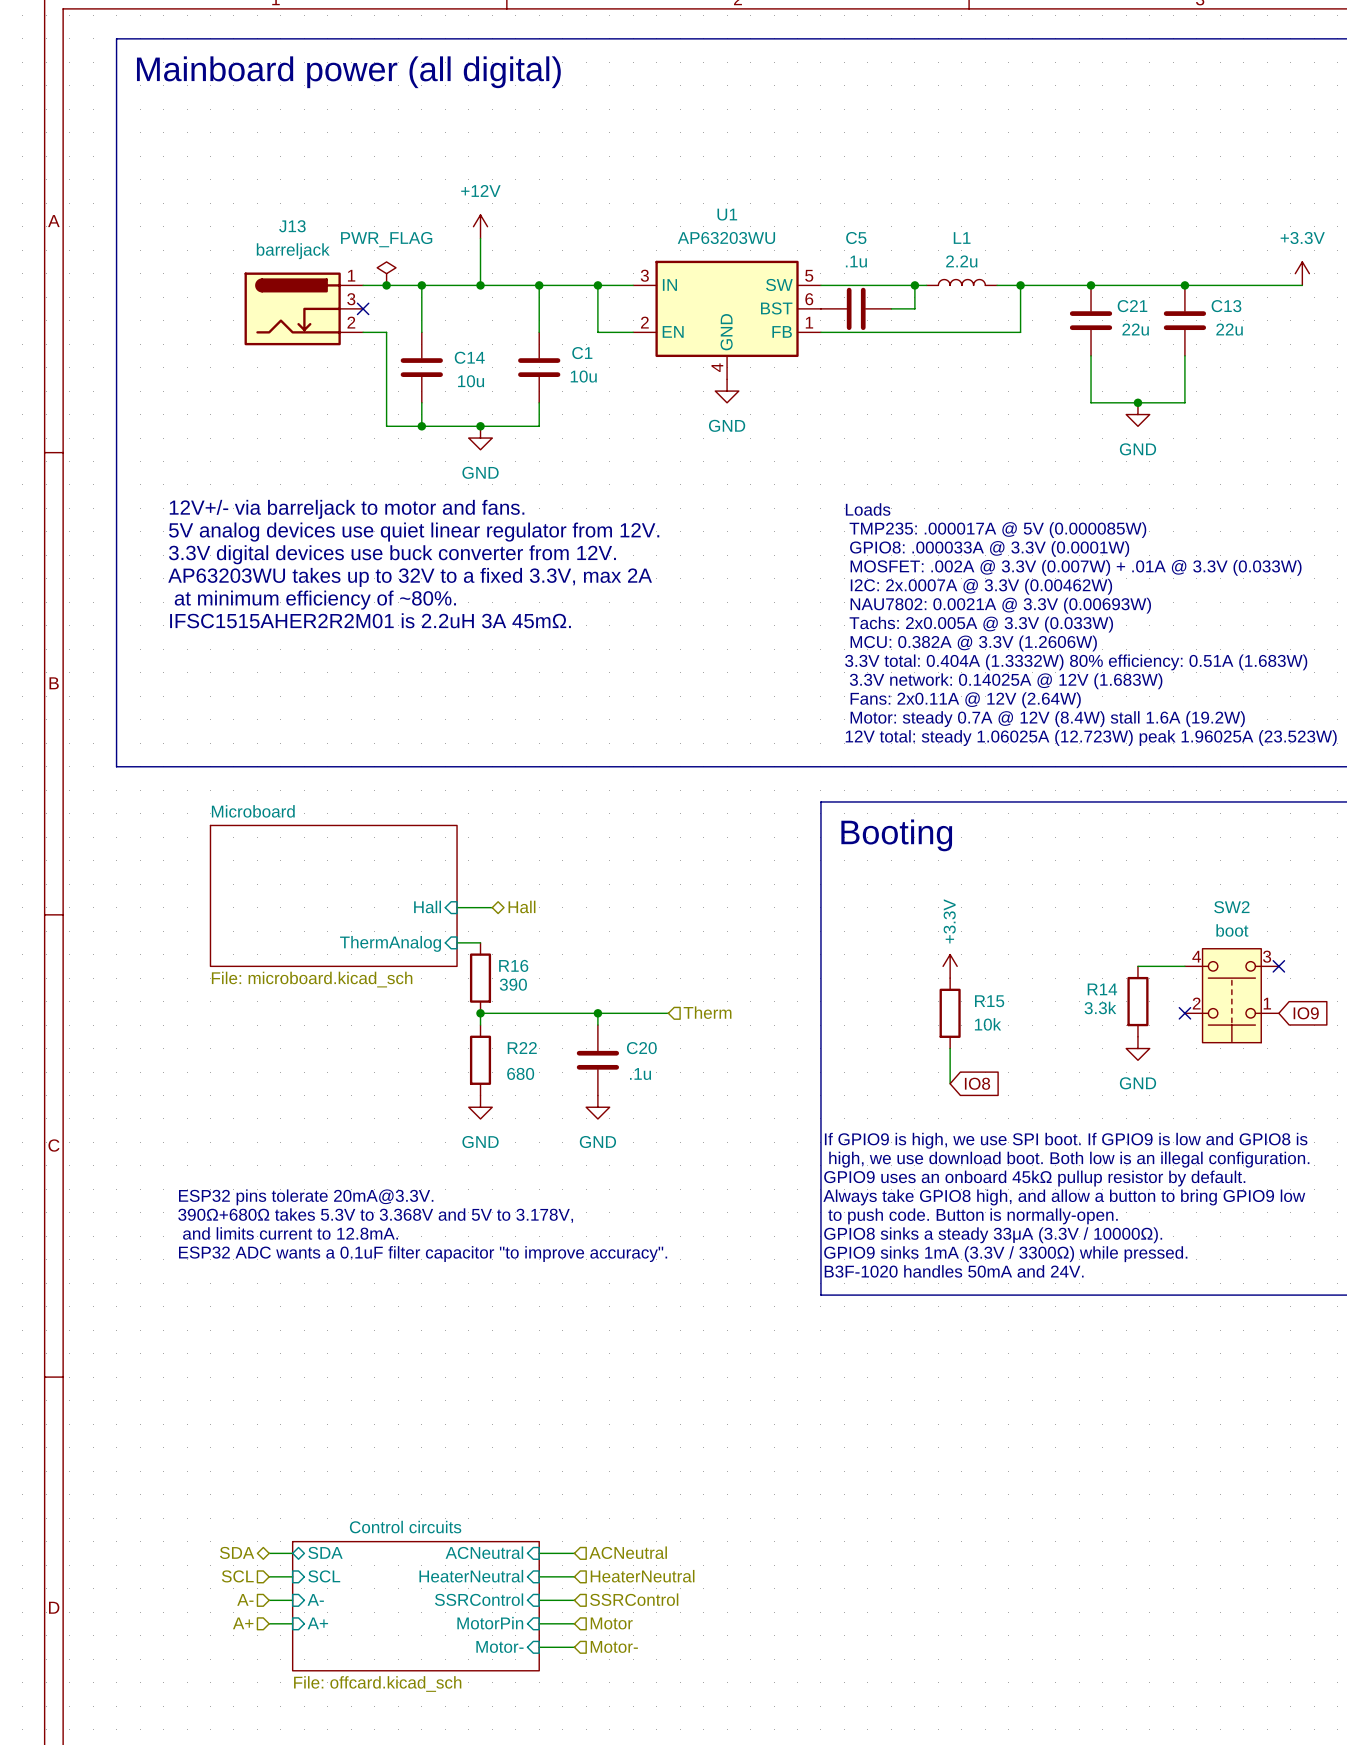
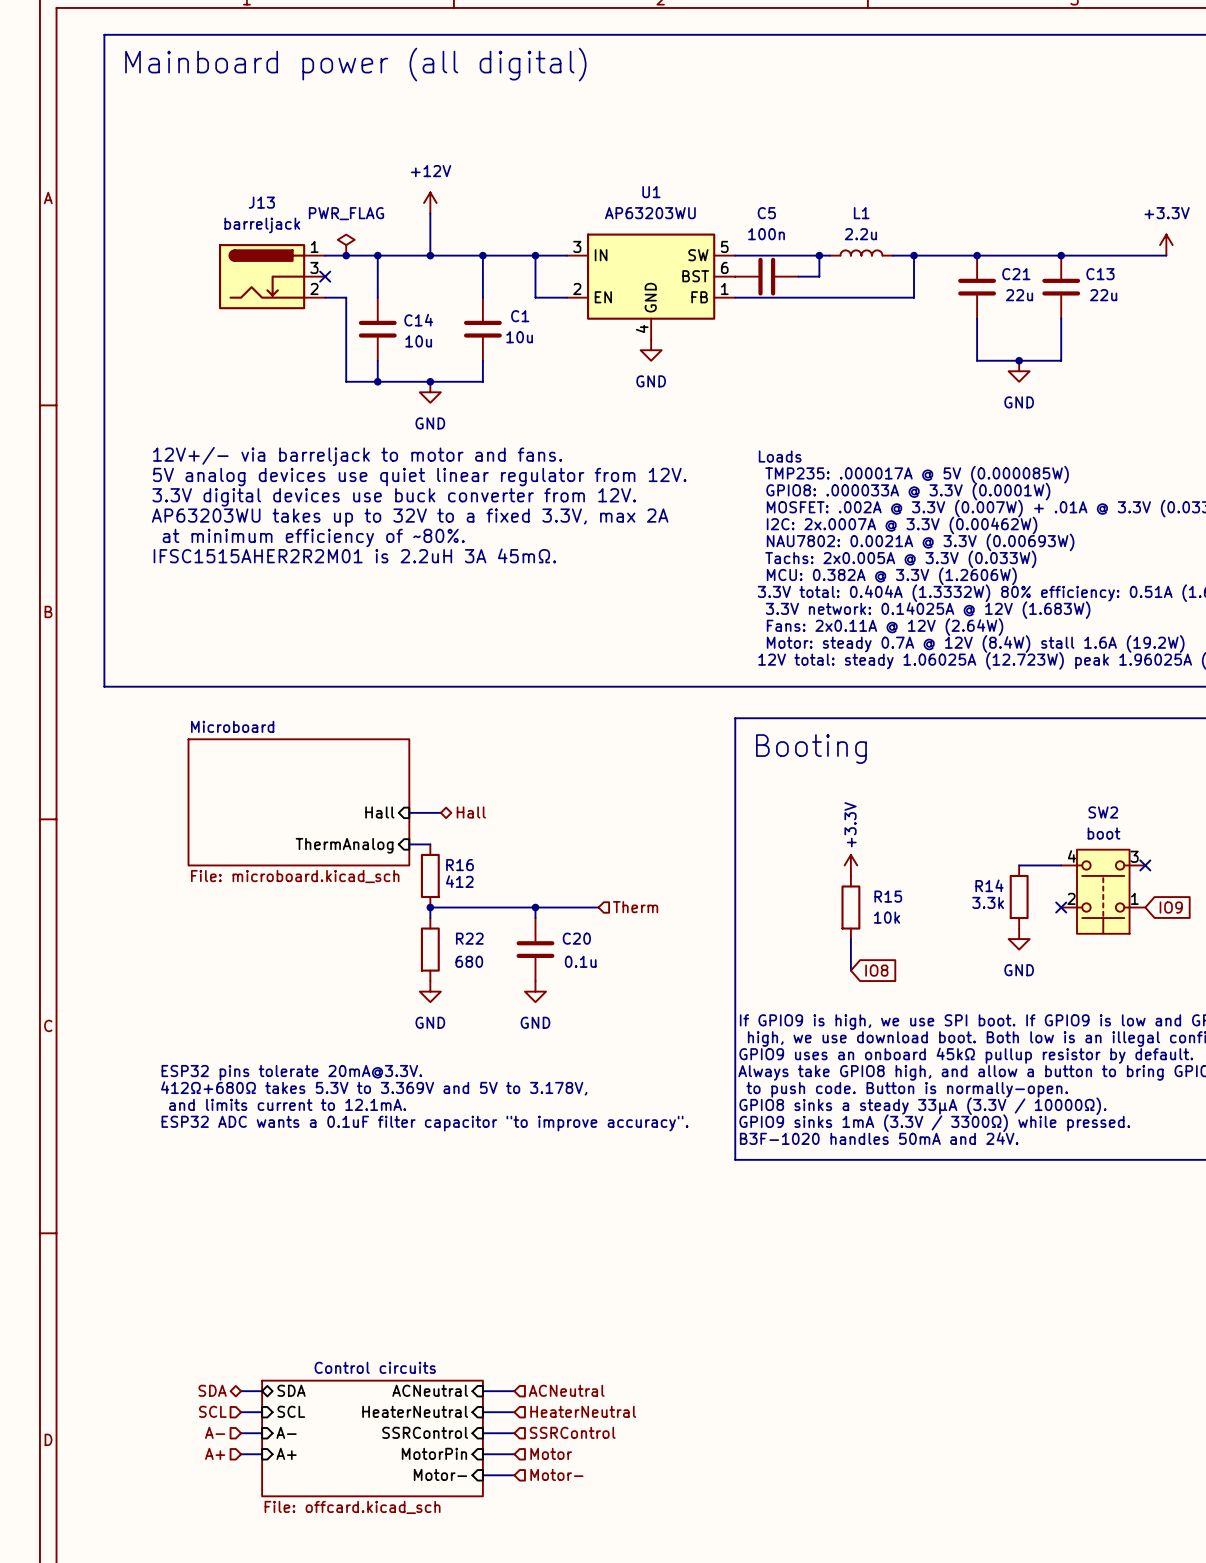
C5 value: .1u (856, 261) -> 100n (766, 234)
R16 value: 390 (513, 984) -> 412 (459, 881)
C20 value: .1u (640, 1074) -> 0.1u (580, 961)
text: 390Ω+680Ω takes 5.3V to 3.368V and 5V to 3.178V, (375, 1215) -> 412Ω+680Ω takes 5.3V to 3.369V and 5V to 3.178V, (374, 1088)
text: and limits current to 12.8mA. (290, 1233) -> and limits current to 12.1mA. (287, 1104)

